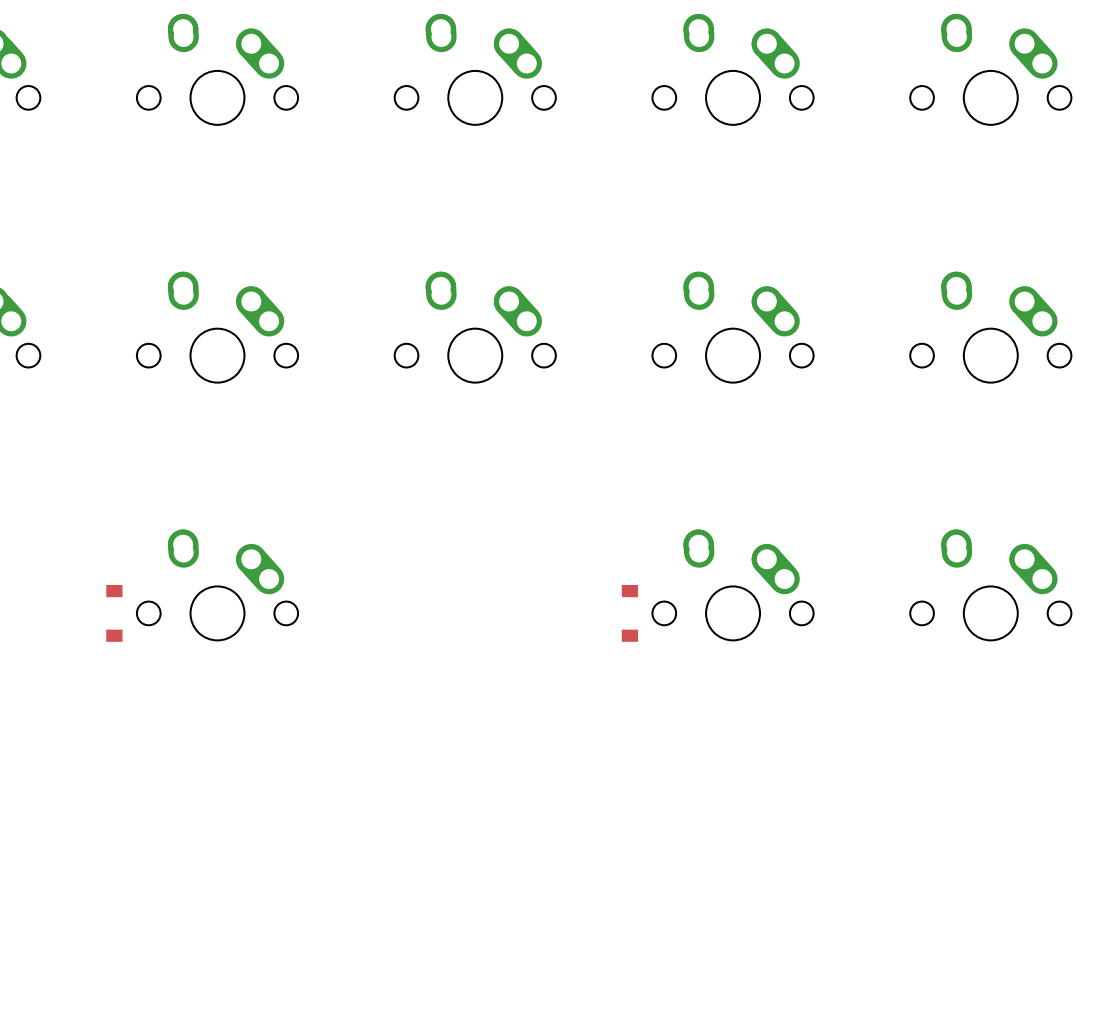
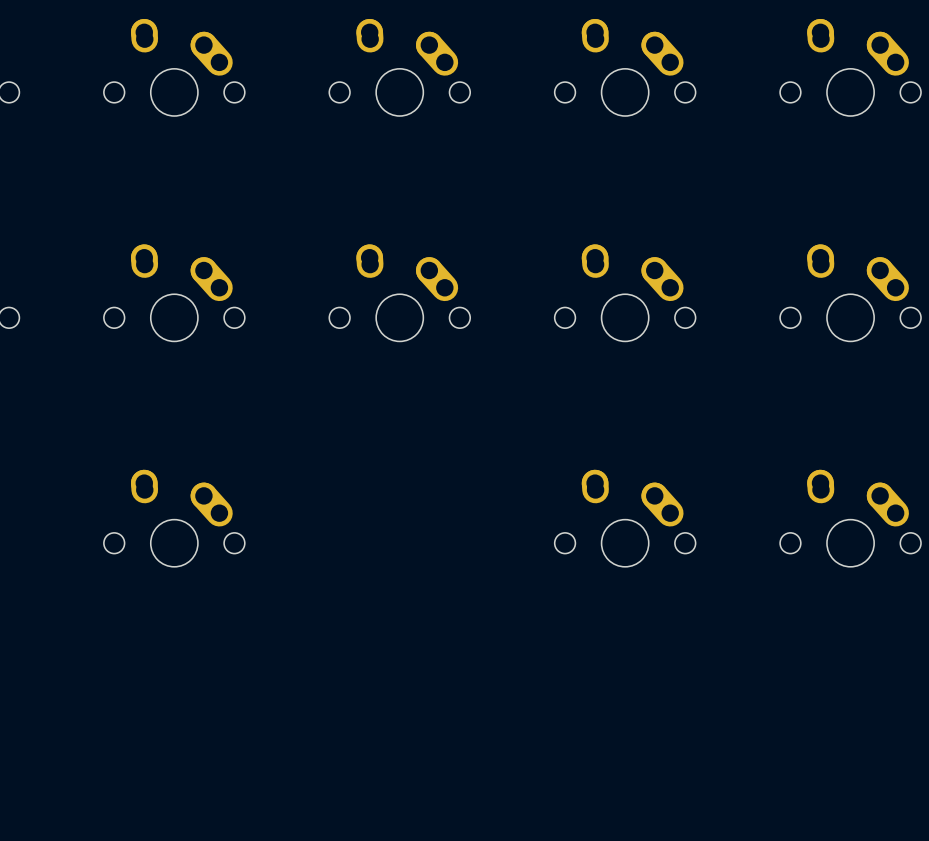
part: (114, 613) -> none
part: (629, 613) -> none

